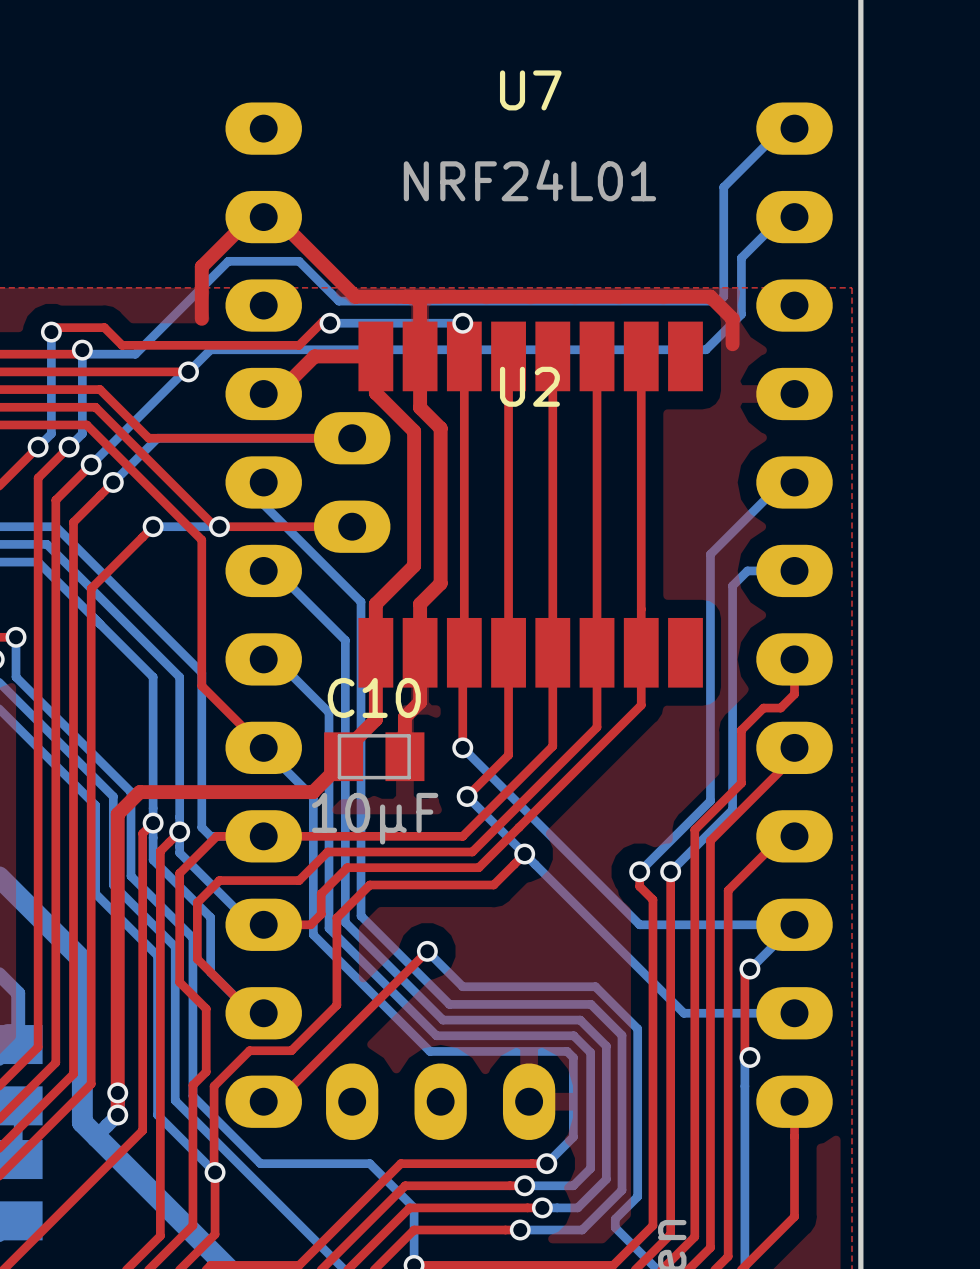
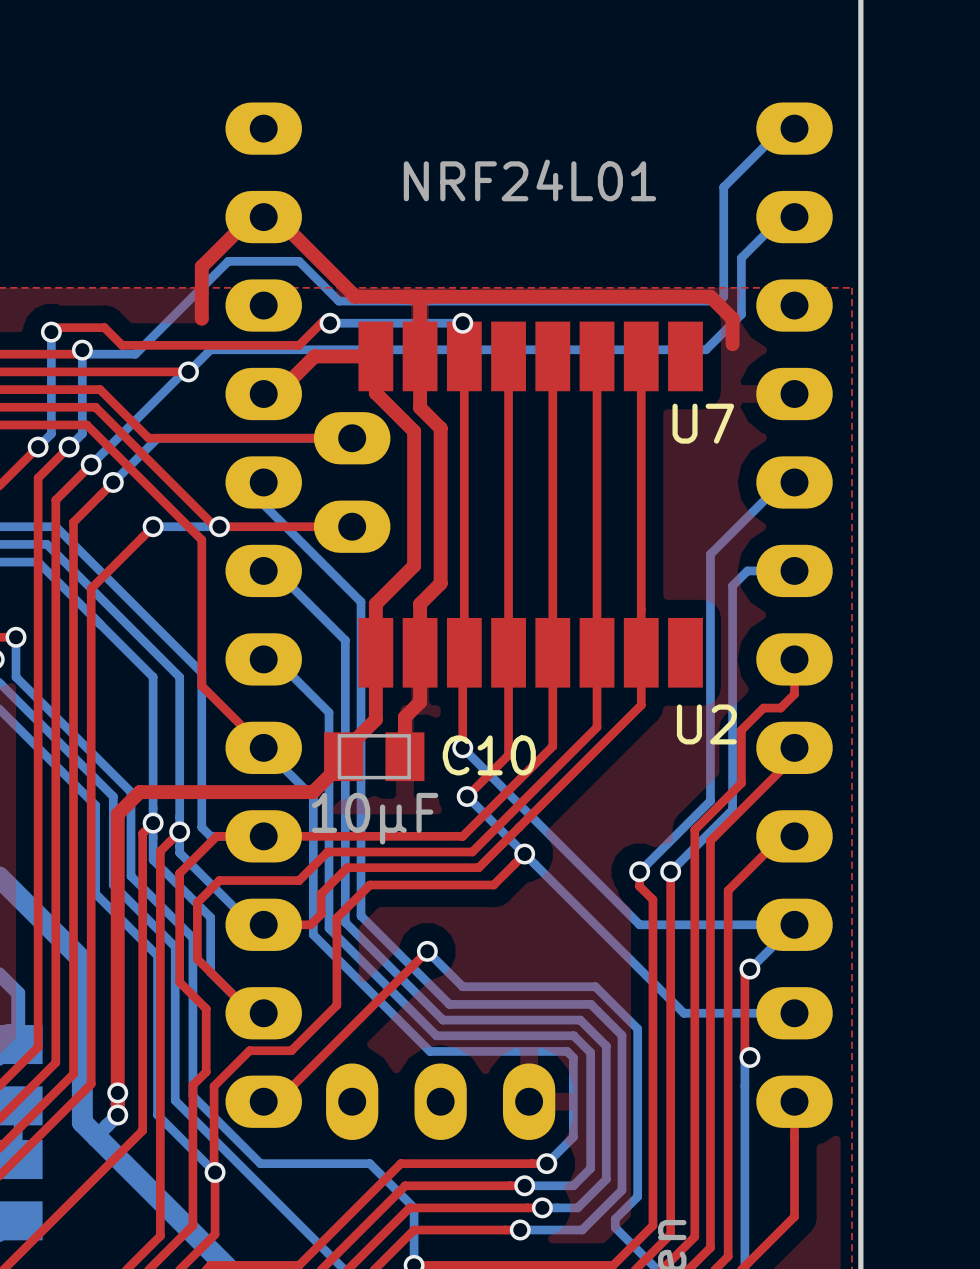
U7 name position: U7 (530, 90) -> U7 (703, 423)
U2 name position: U2 (529, 386) -> U2 (706, 724)
C10 name position: C10 (374, 697) -> C10 (489, 755)

